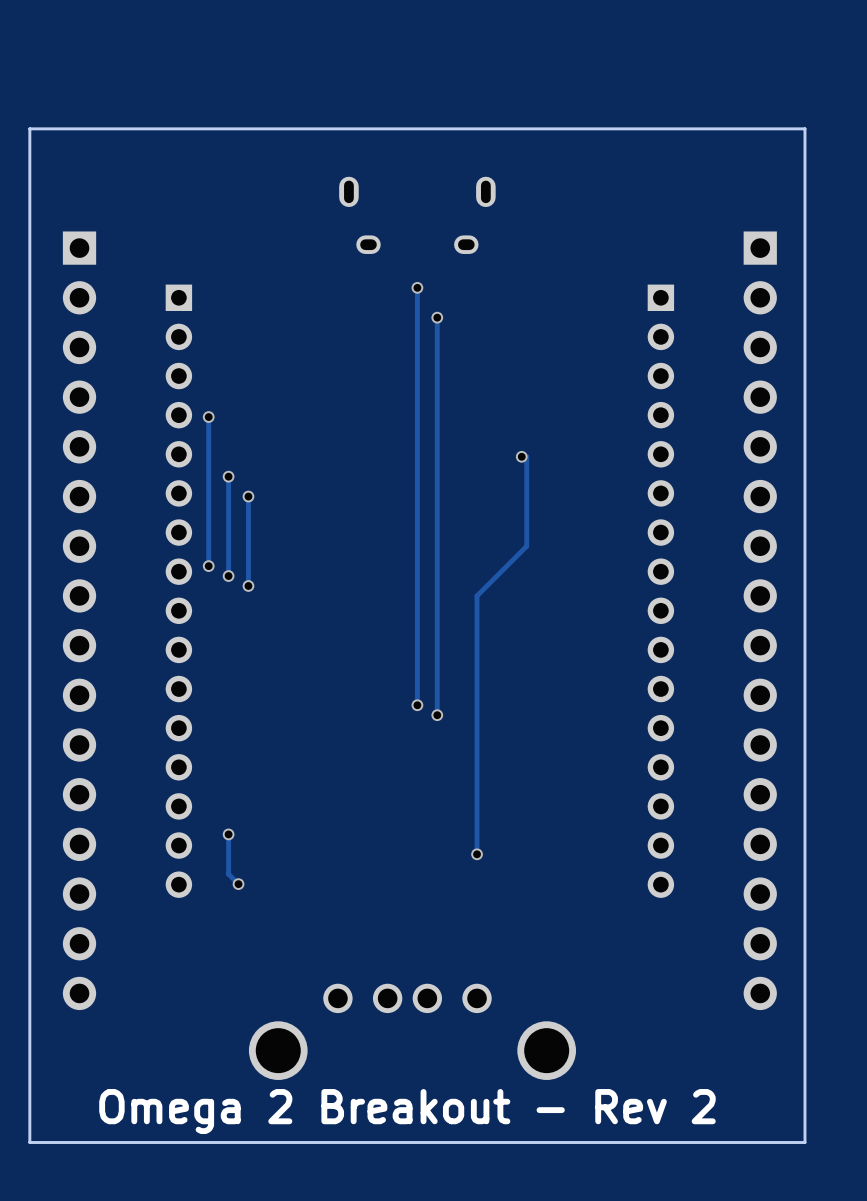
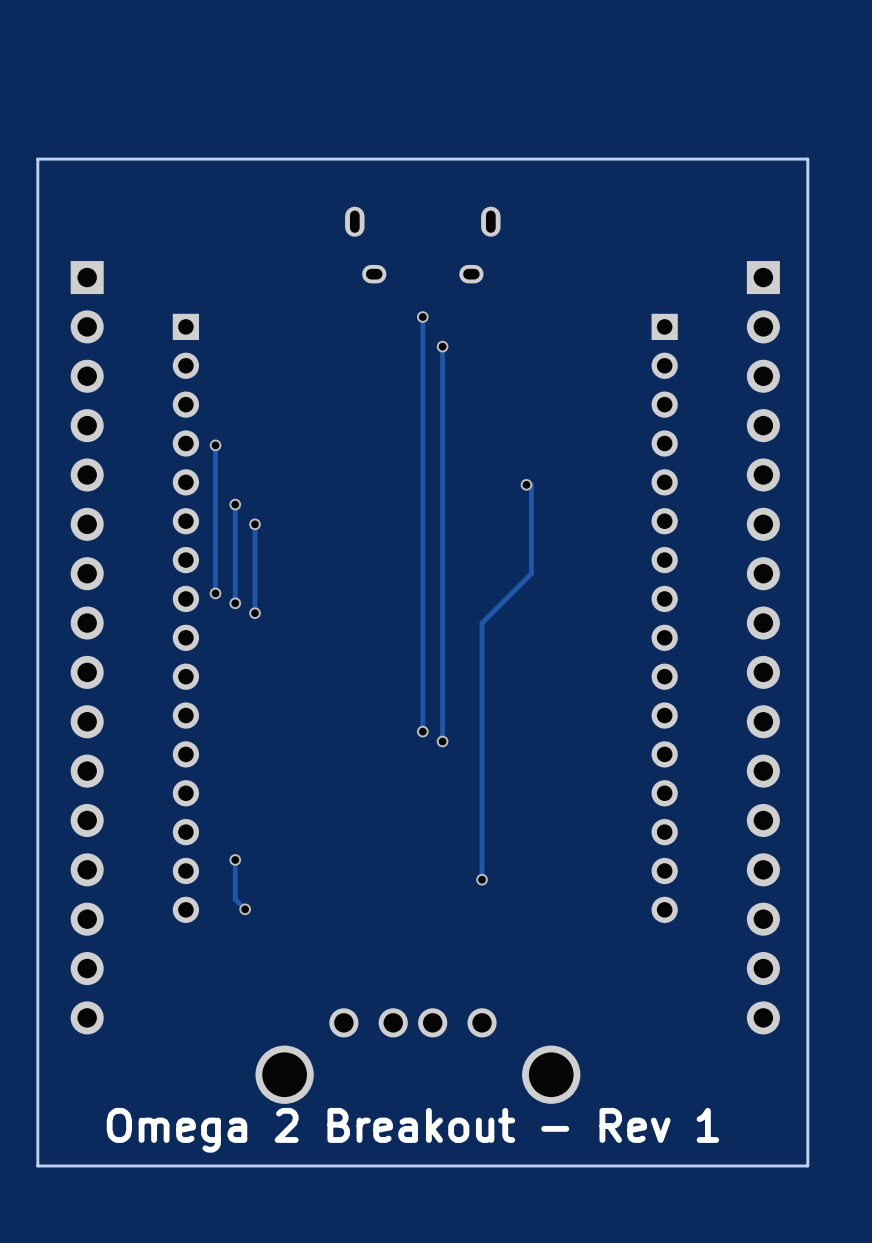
text: Omega 2 Breakout - Rev 2 (407, 1111) -> Omega 2 Breakout - Rev 1 (412, 1130)

